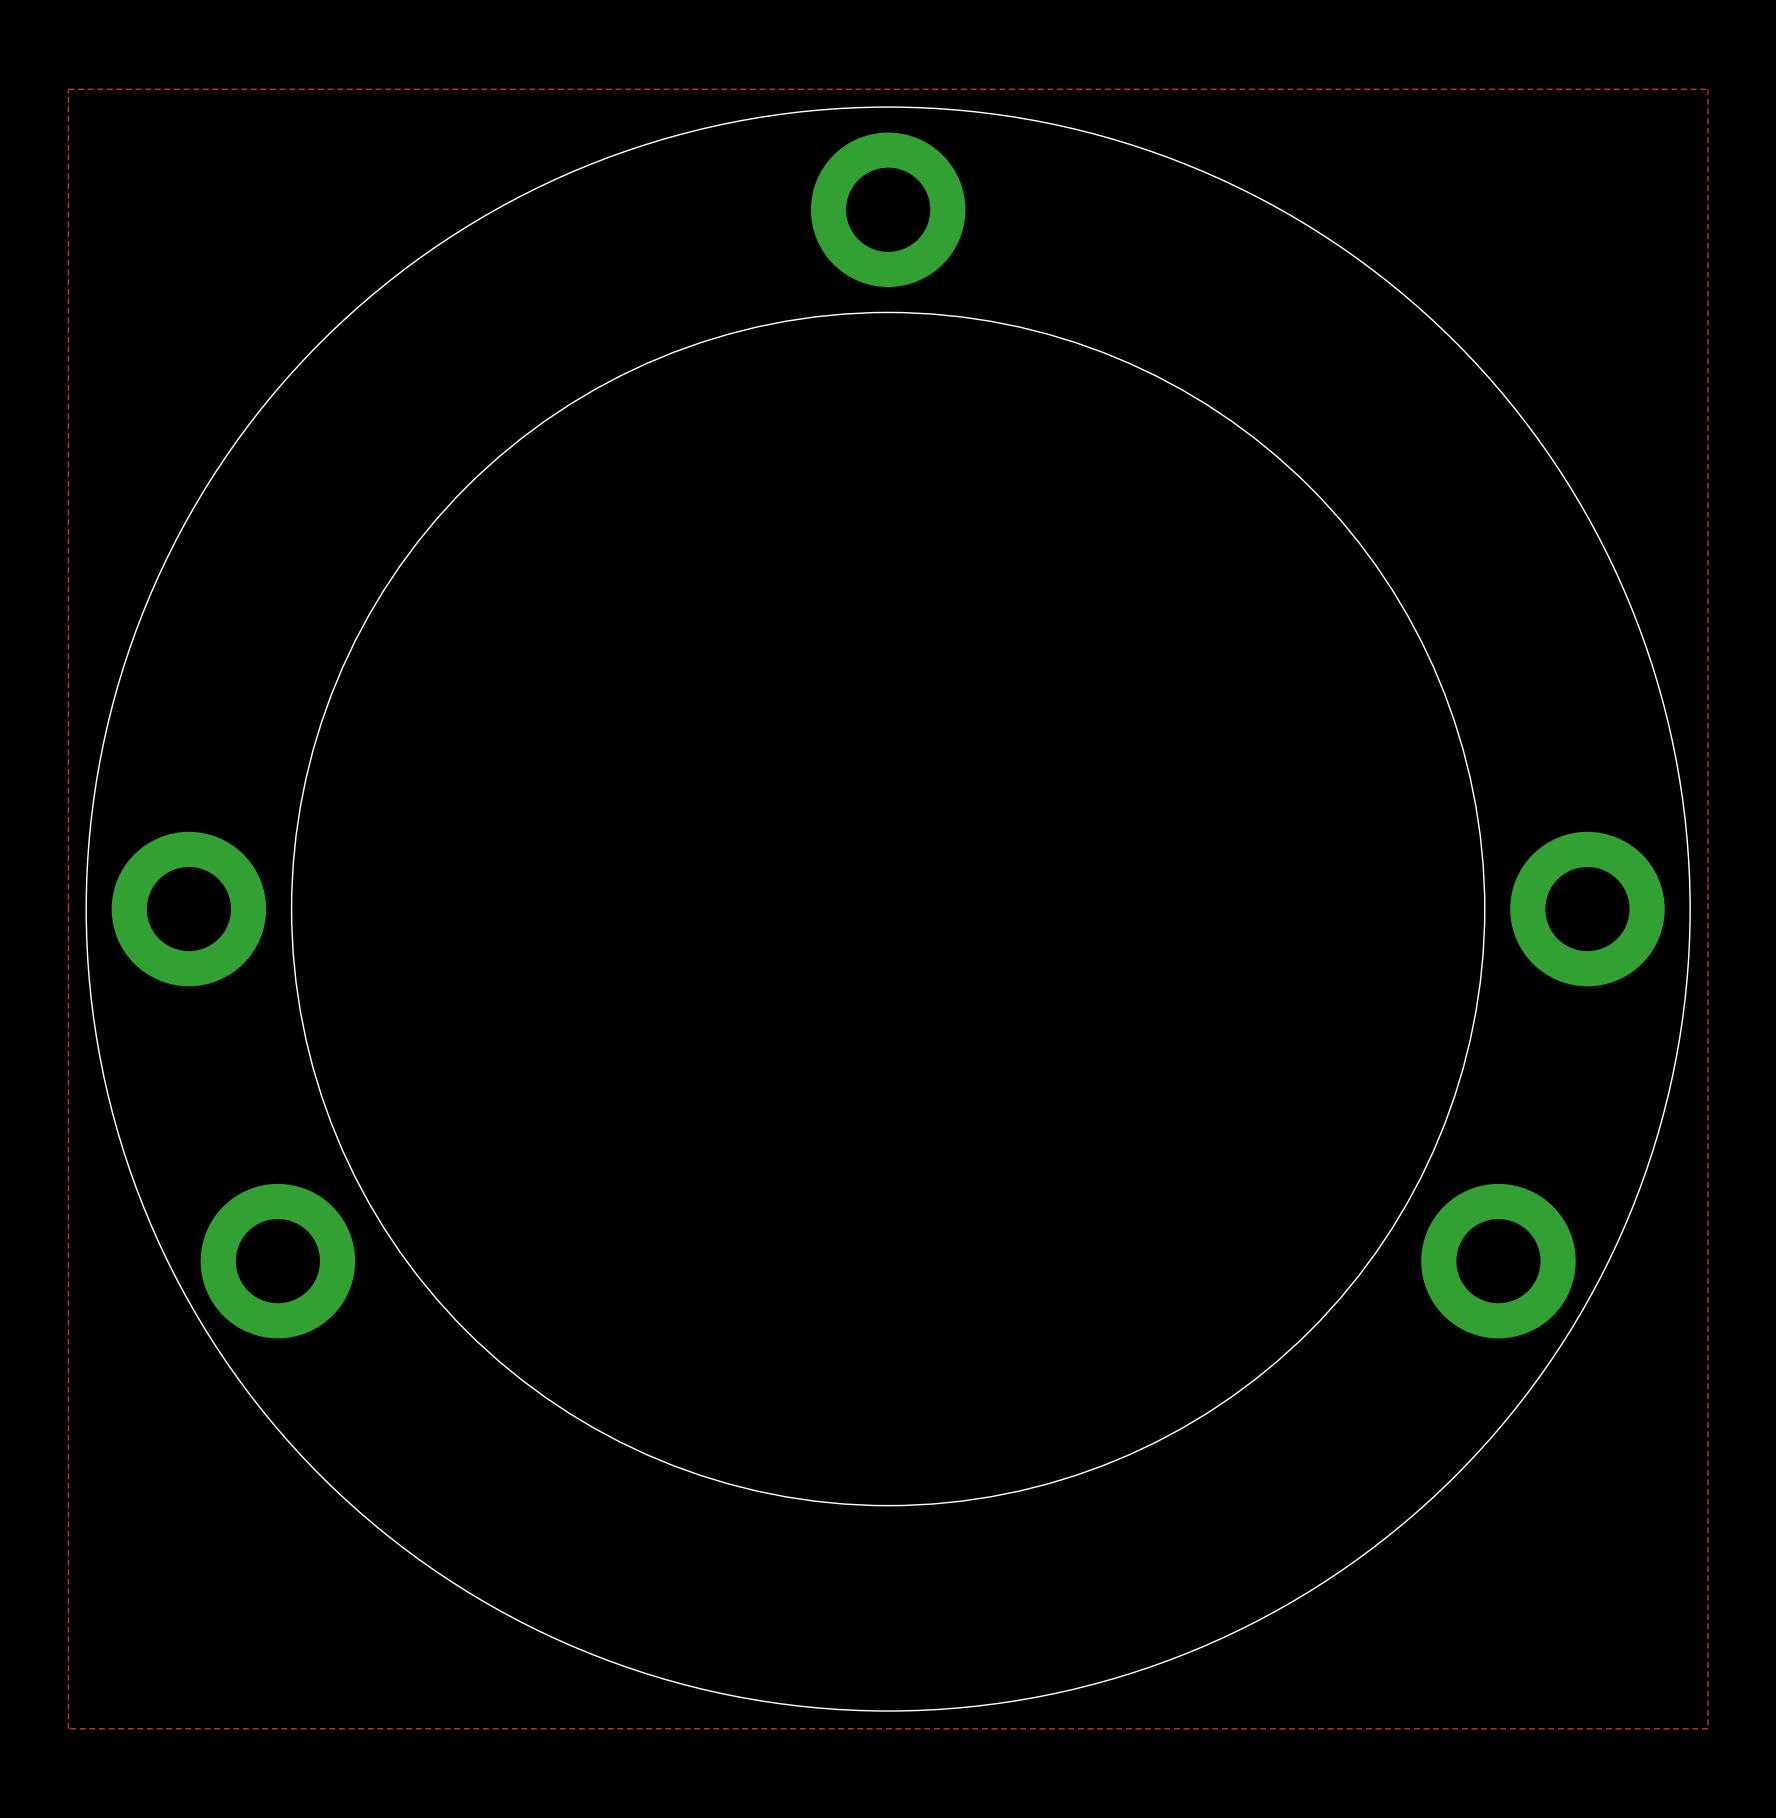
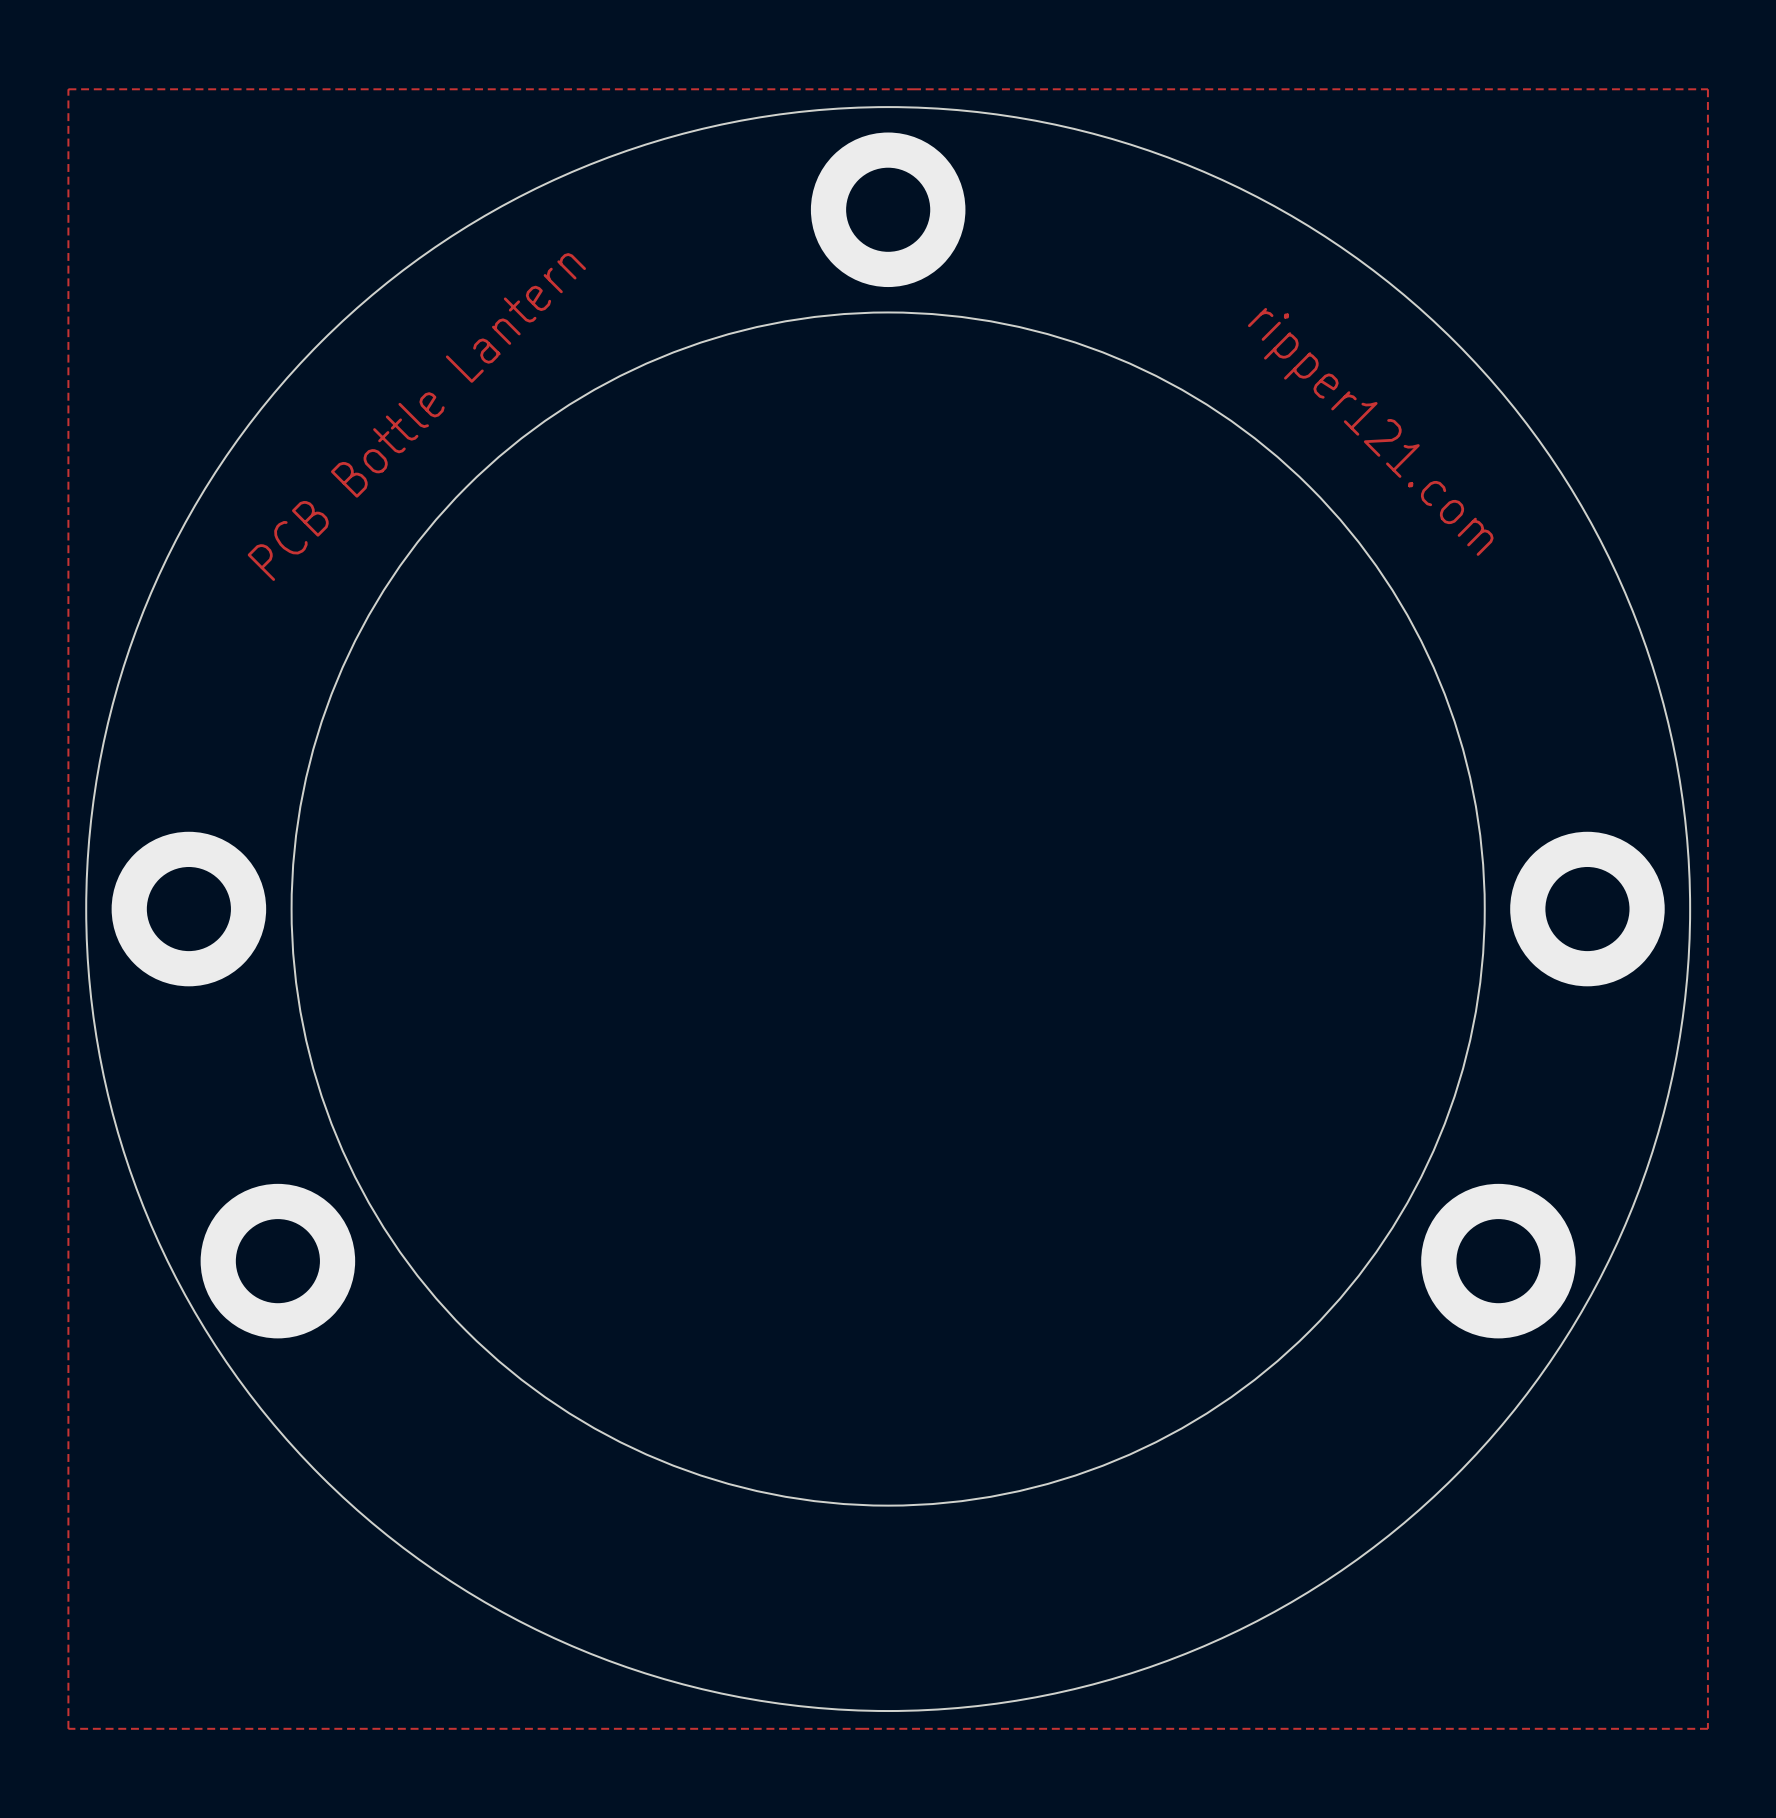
text: none -> PCB Bottle Lantern (416, 417)
text: none -> ripper121.com (1370, 431)

